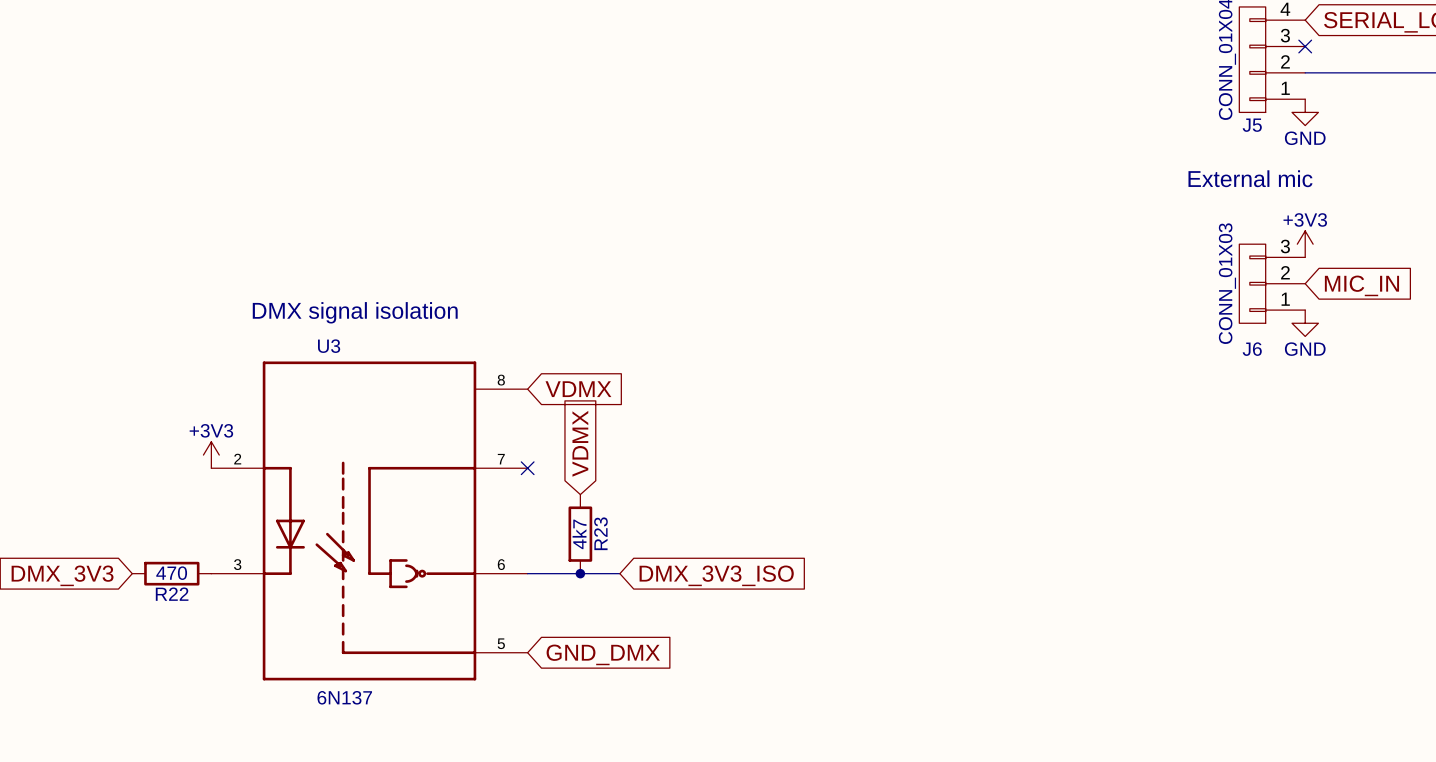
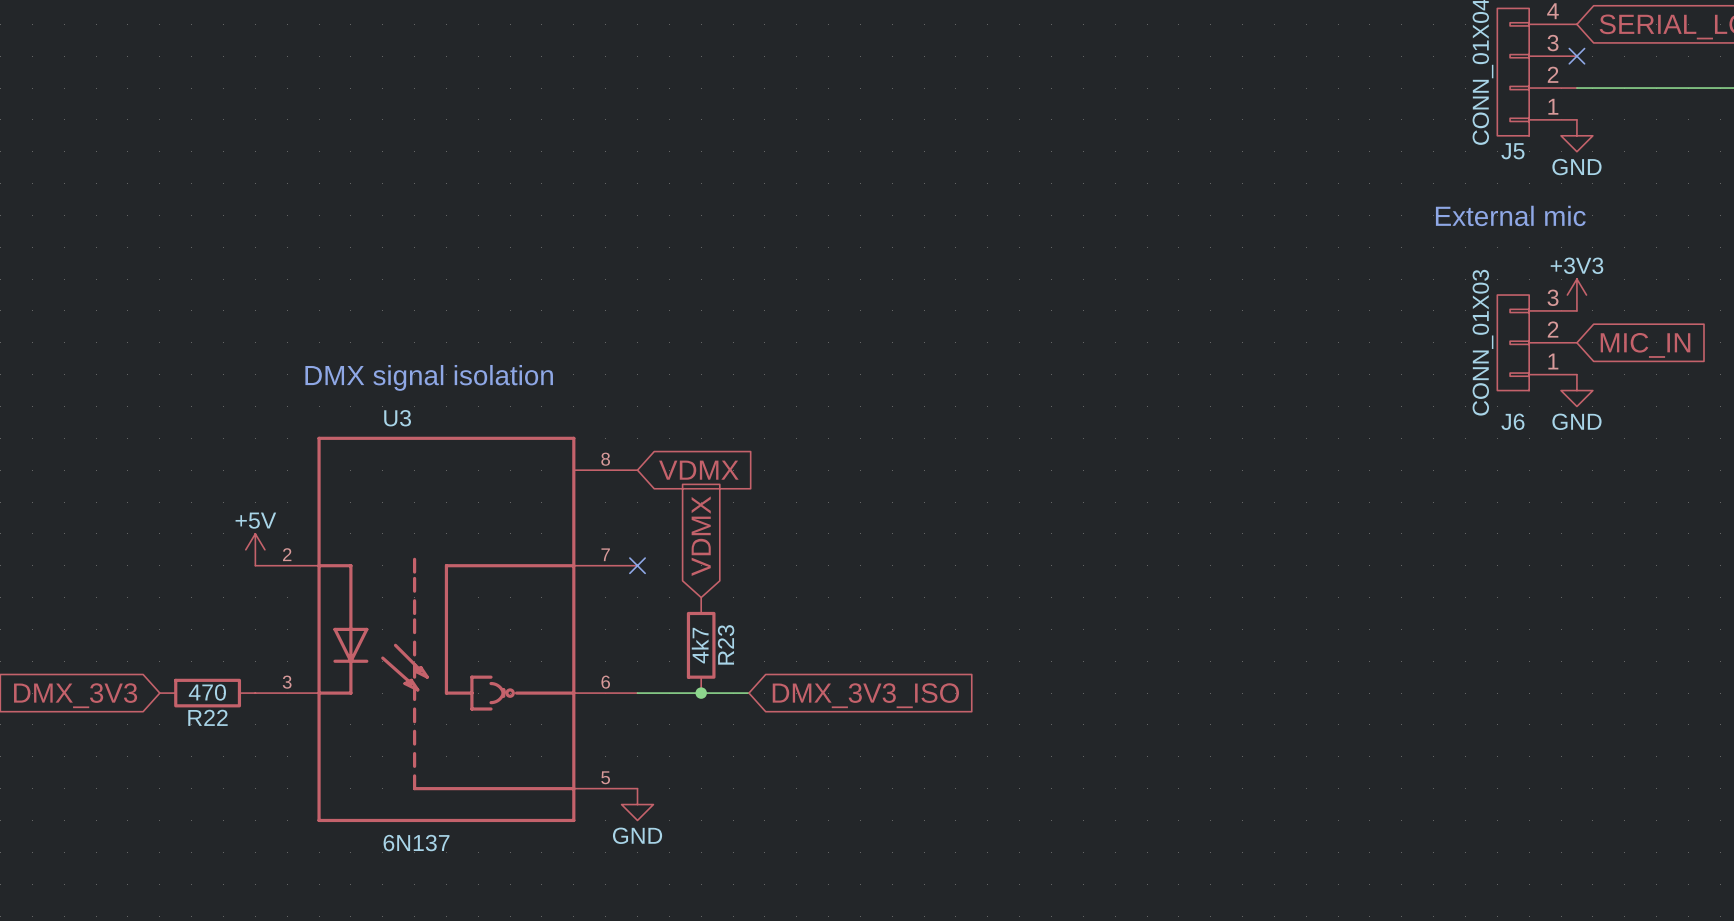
power symbol: +3V3 (211, 455) -> +5V (255, 549)
global label: GND_DMX (603, 654) -> none
power symbol: none -> GND (637, 804)

